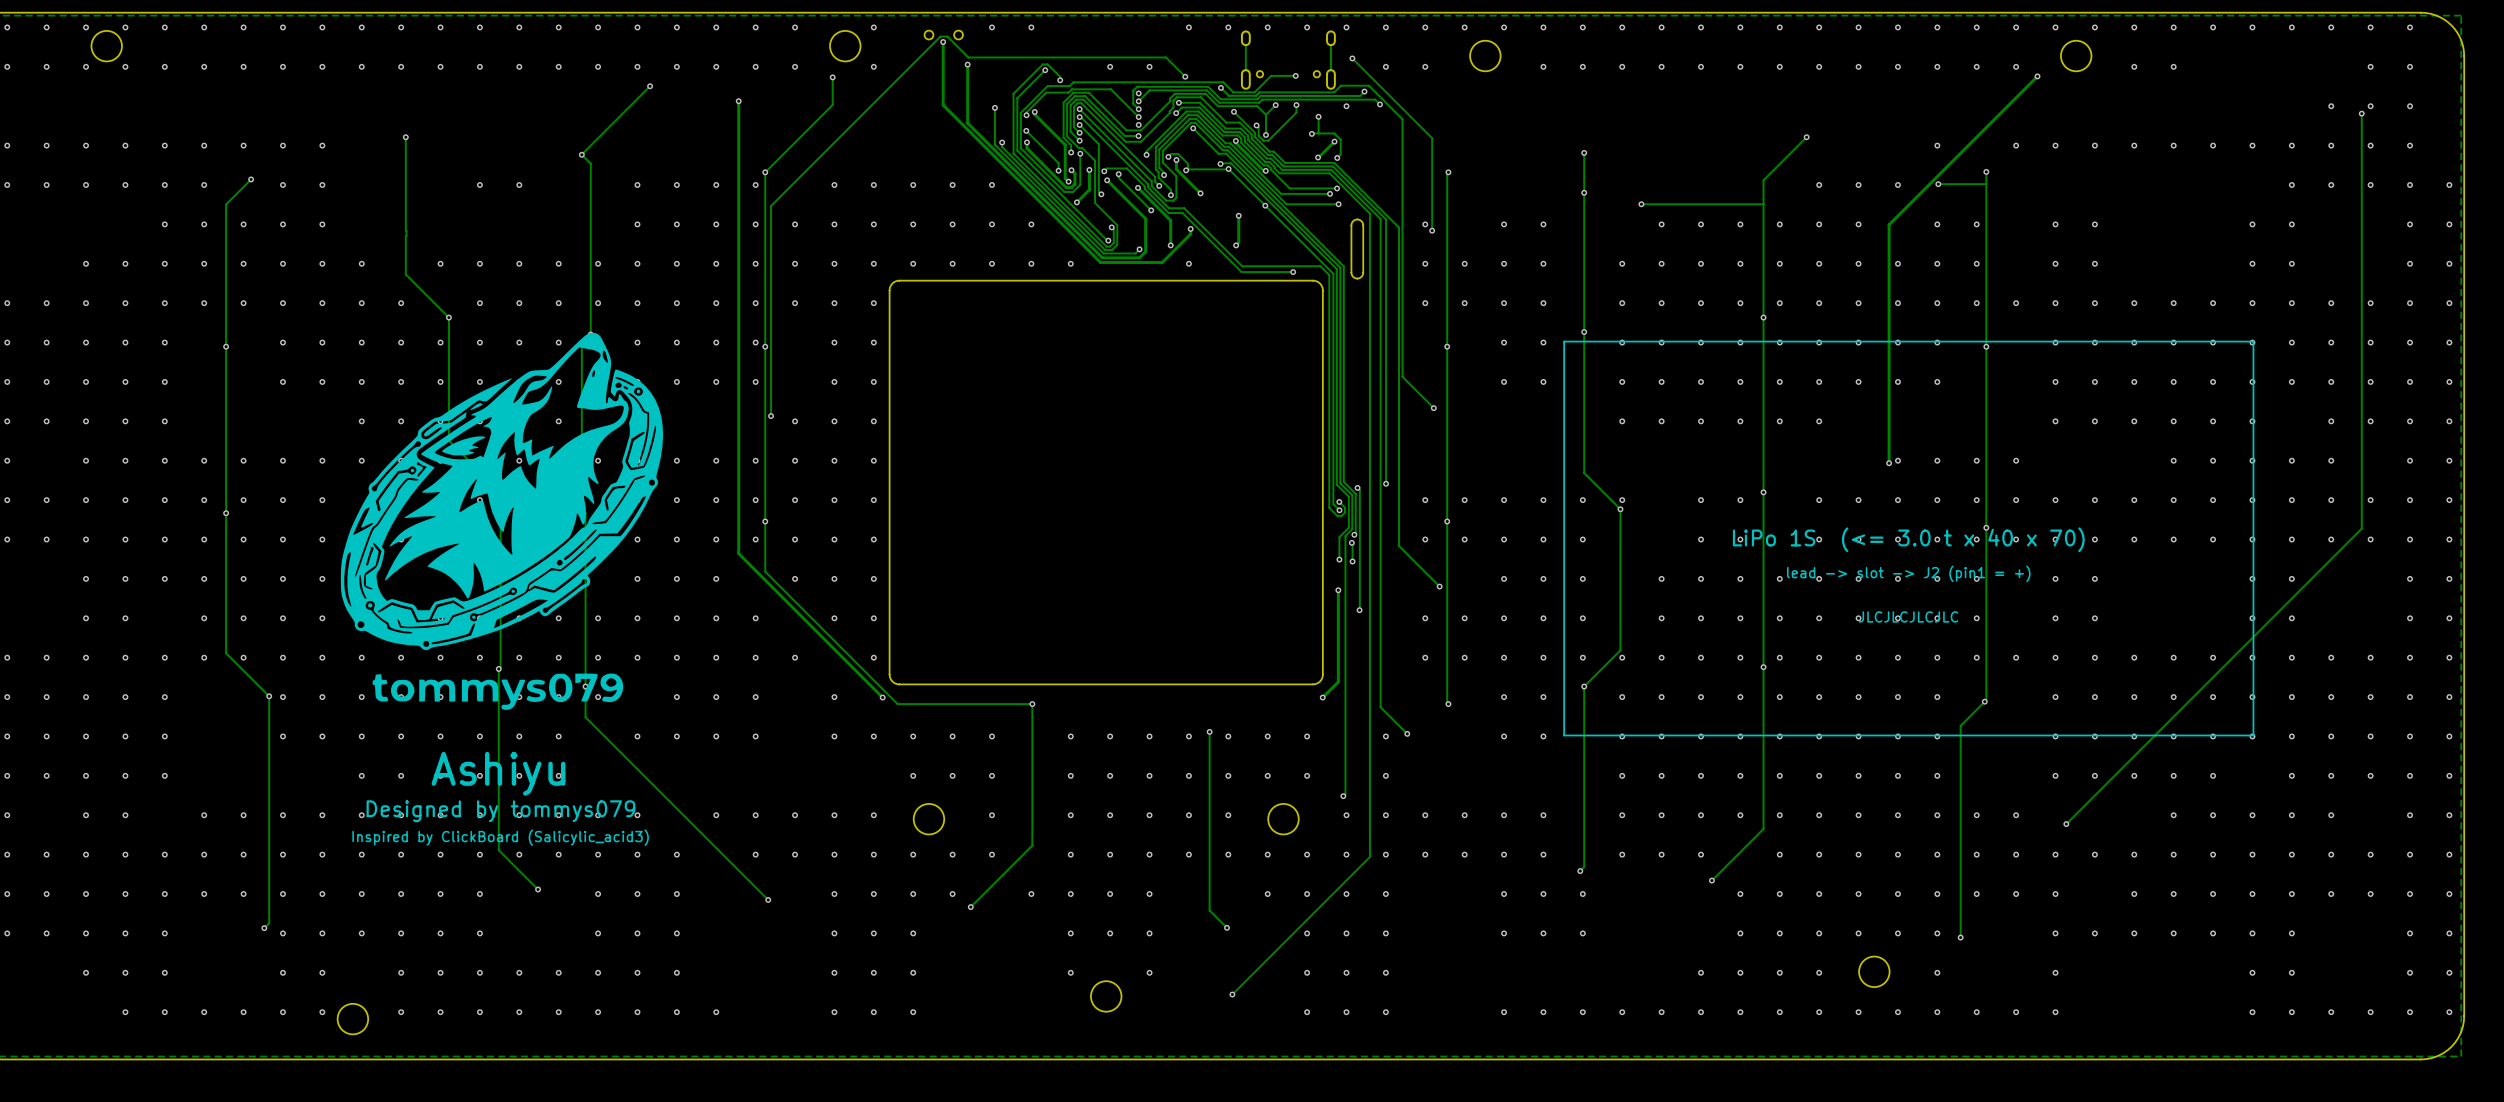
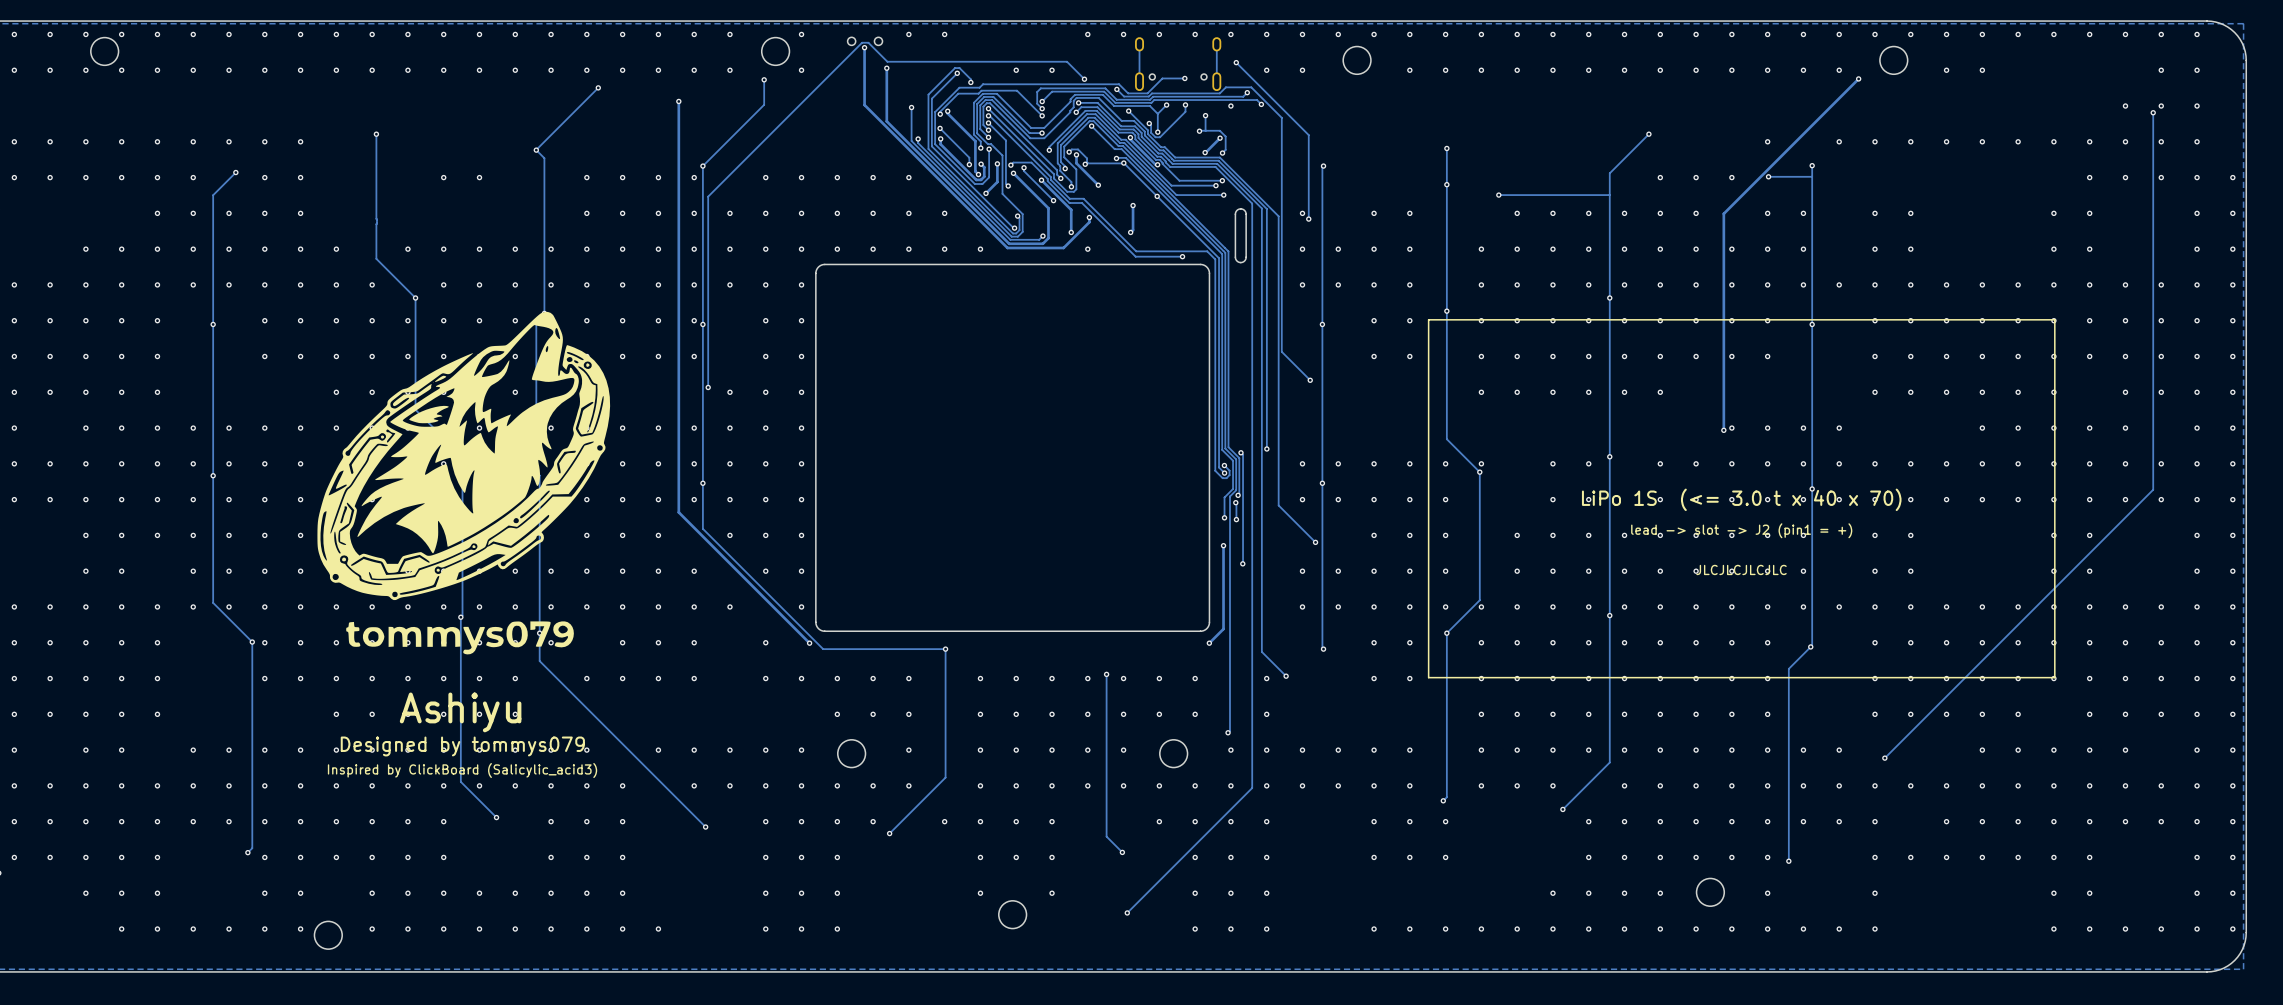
via: (1138, 93) -> none
via: (1138, 124) -> none

